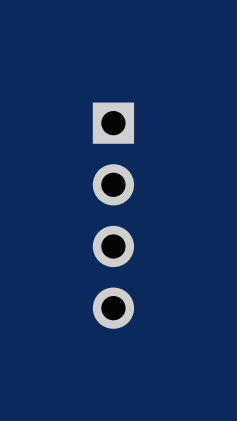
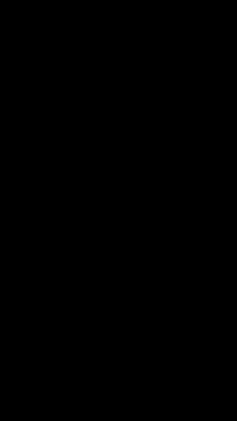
part: (113, 215) -> none

